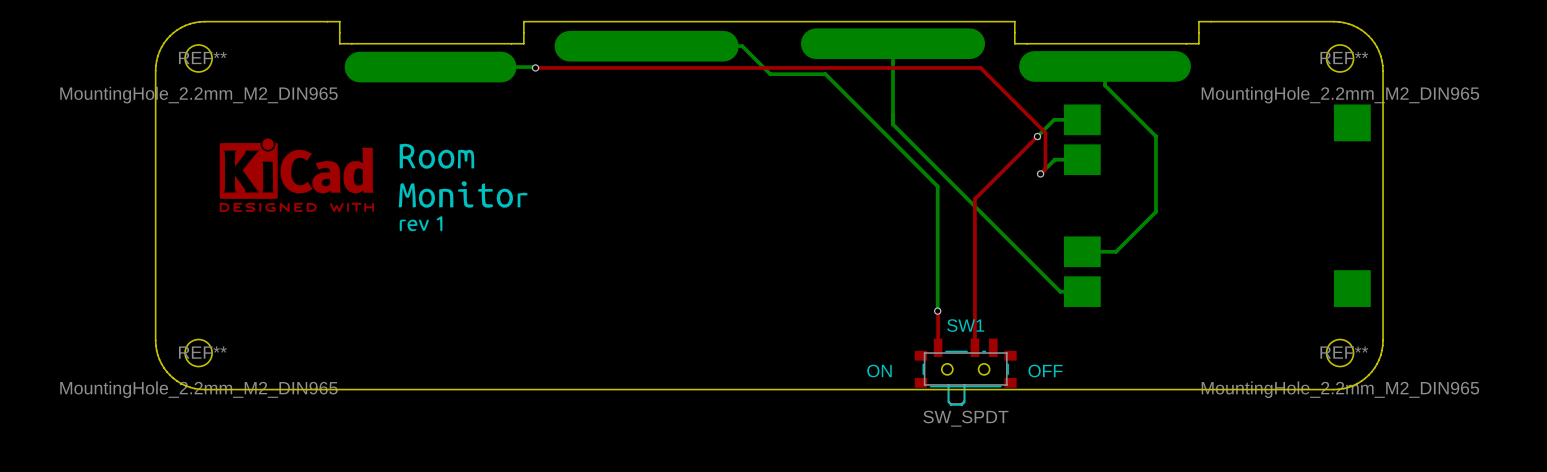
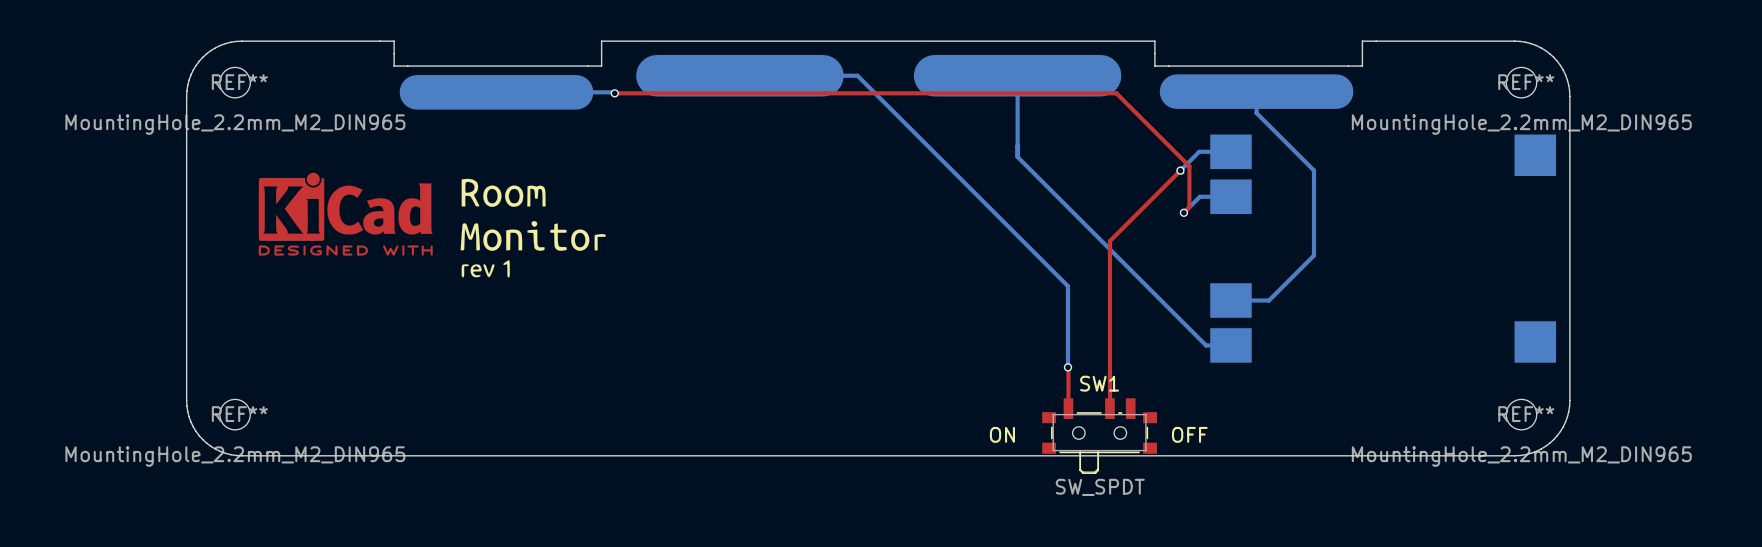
part footprint: [800, 28, 986, 60] -> [913, 54, 1122, 97]
part footprint: [554, 30, 739, 62] -> [636, 54, 844, 97]
bottom track: (646, 46) (742, 46) (770, 74) (825, 74) (937, 186) (937, 239) -> (739, 75) (857, 75) (1067, 286)

